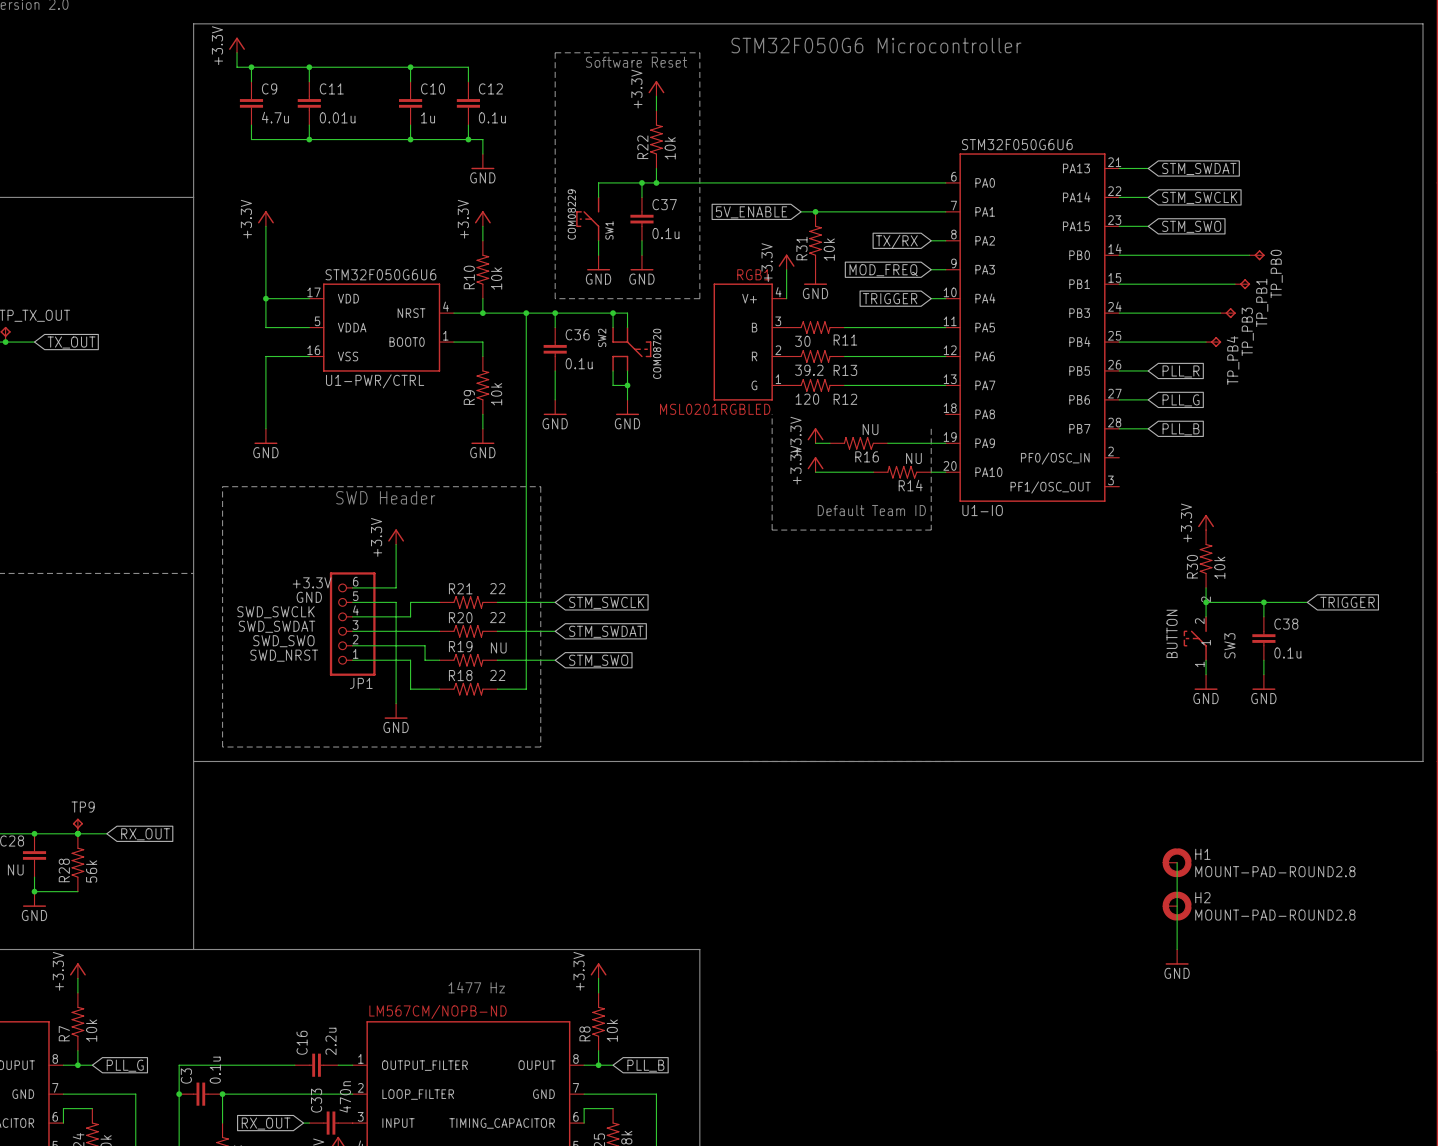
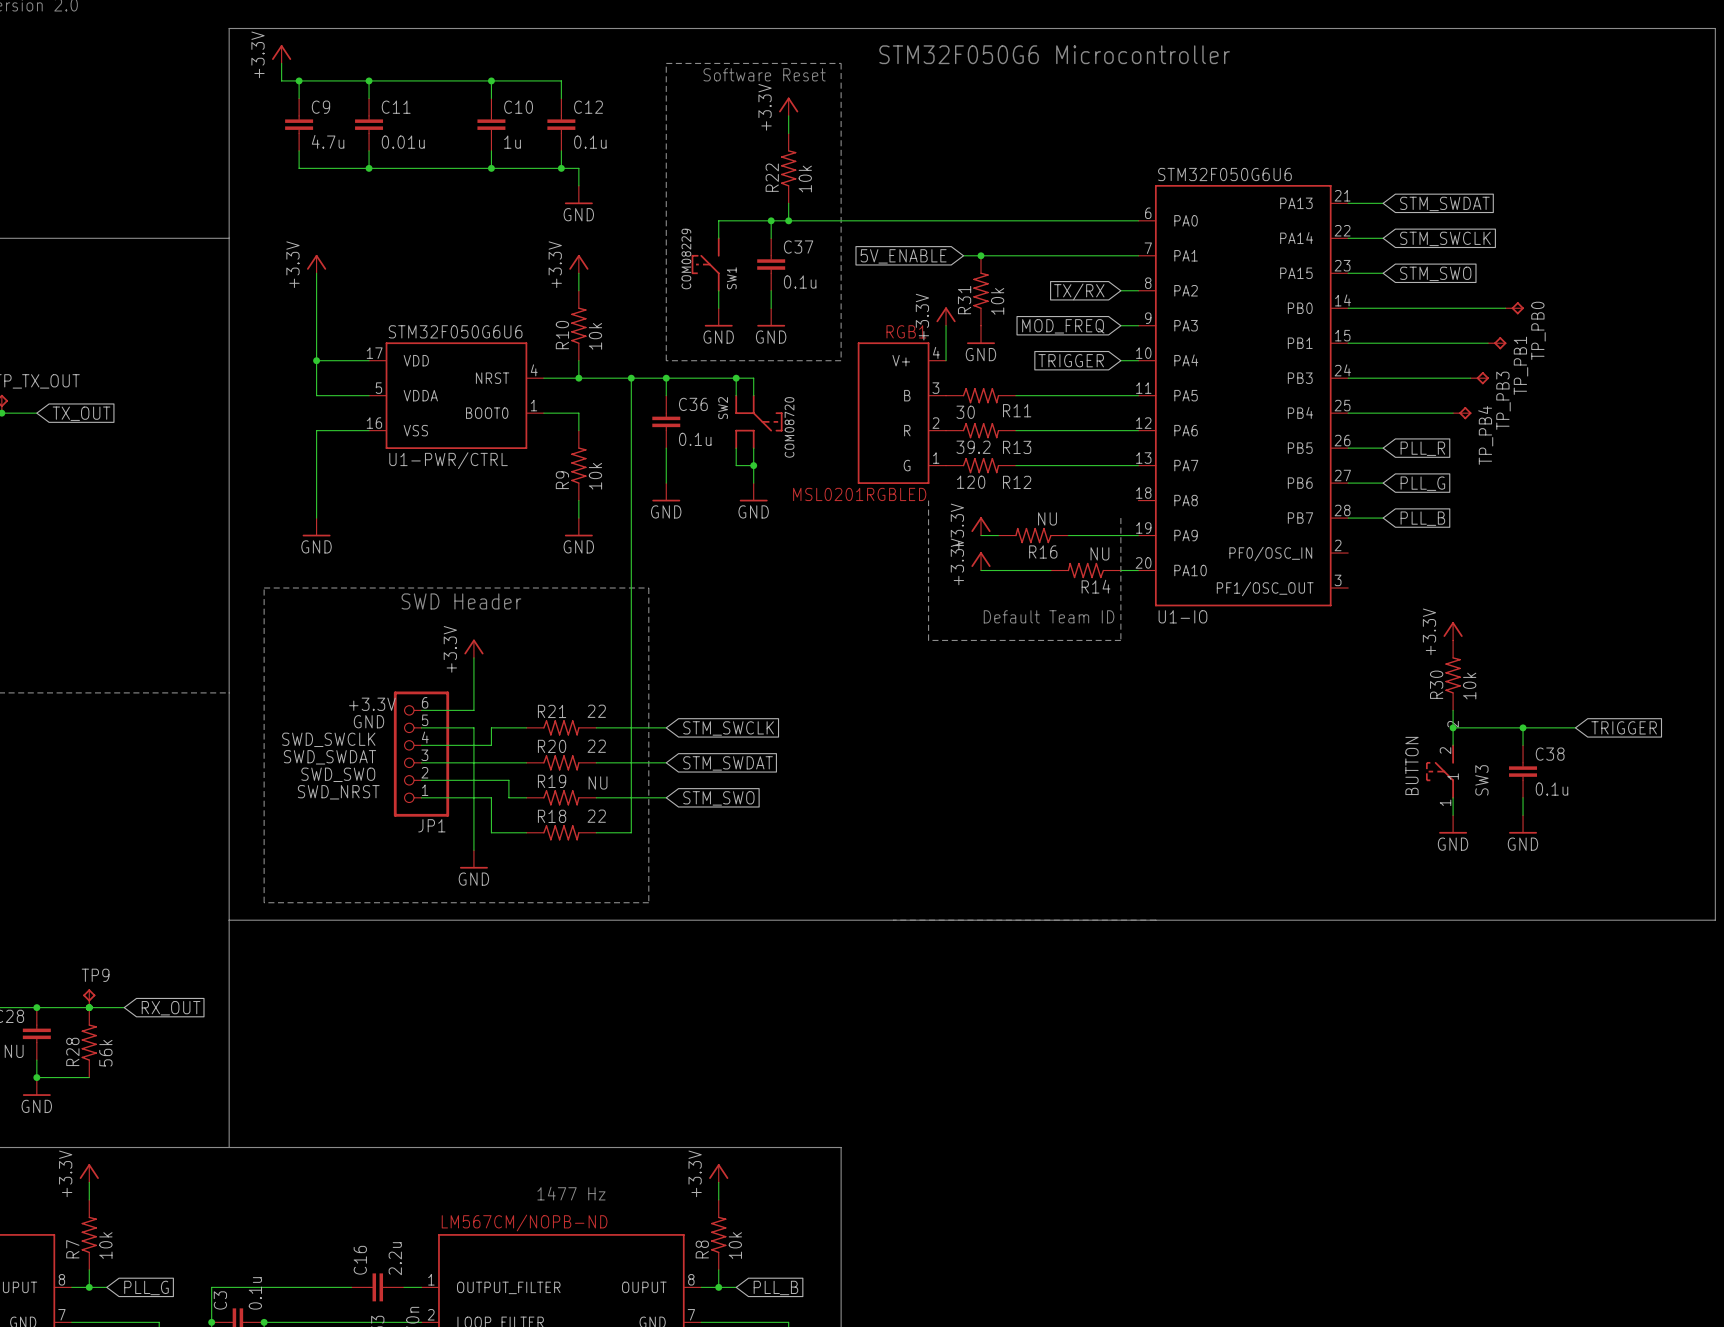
wire: (1177, 862) (1177, 949) -> none
H1: MOUNT-PAD-ROUND2.8 (1177, 862) -> none
H2: MOUNT-PAD-ROUND2.8 (1177, 906) -> none
power symbol: GND (1177, 957) -> none

